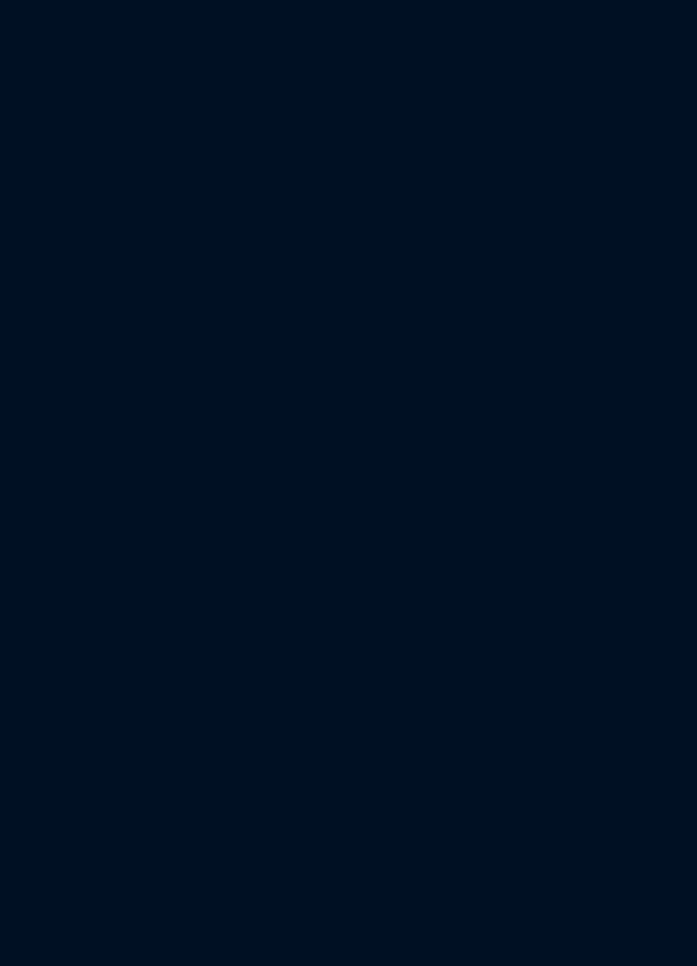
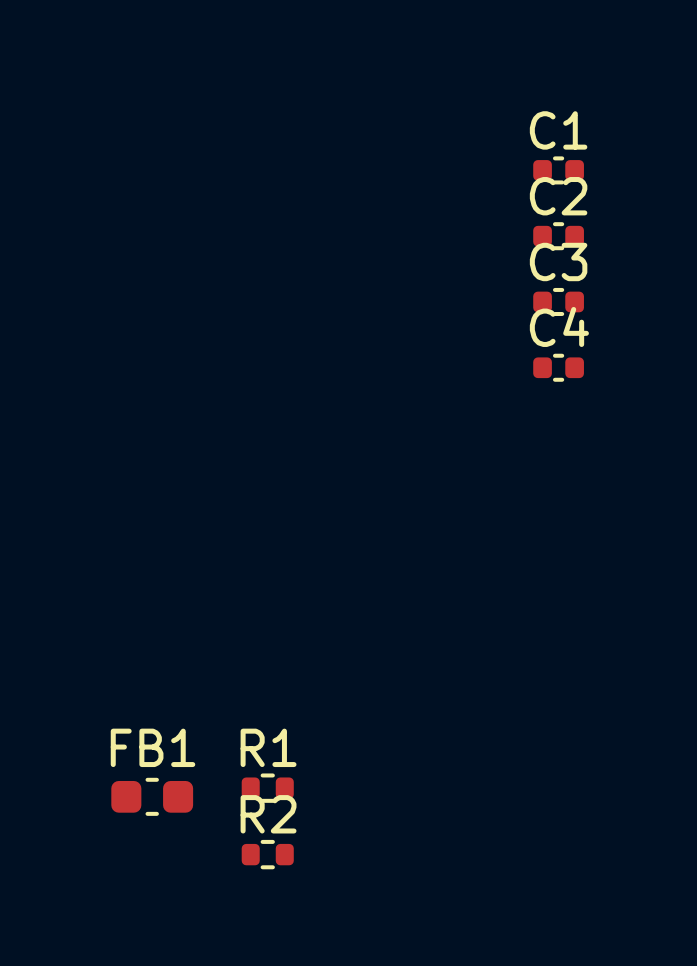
C1: none -> (558, 170)
C2: none -> (558, 236)
C3: none -> (558, 301)
C4: none -> (558, 367)
R1: none -> (267, 788)
FB1: none -> (152, 796)
R2: none -> (267, 854)

